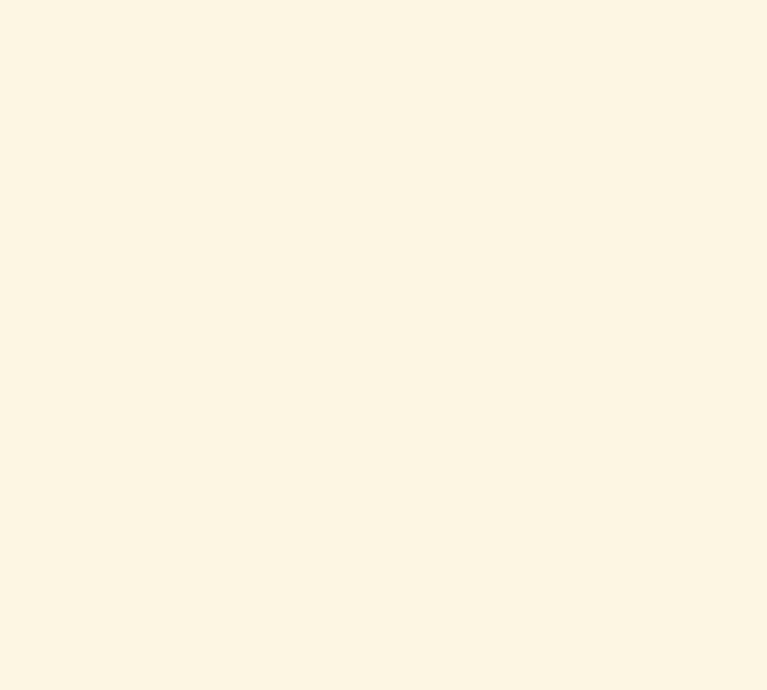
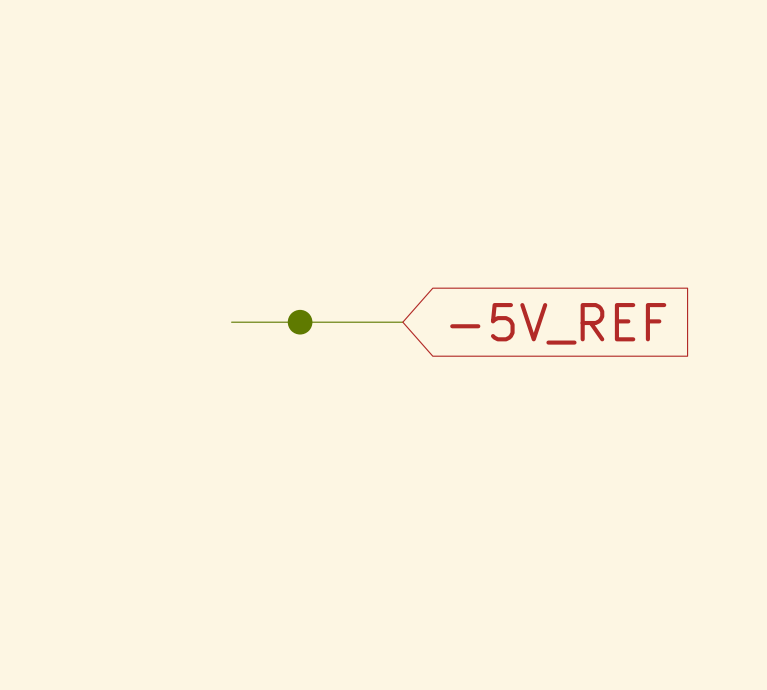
wire: none -> (231, 322) (402, 322)
junction: none -> (300, 322)
global label: none -> -5V_REF (558, 323)

